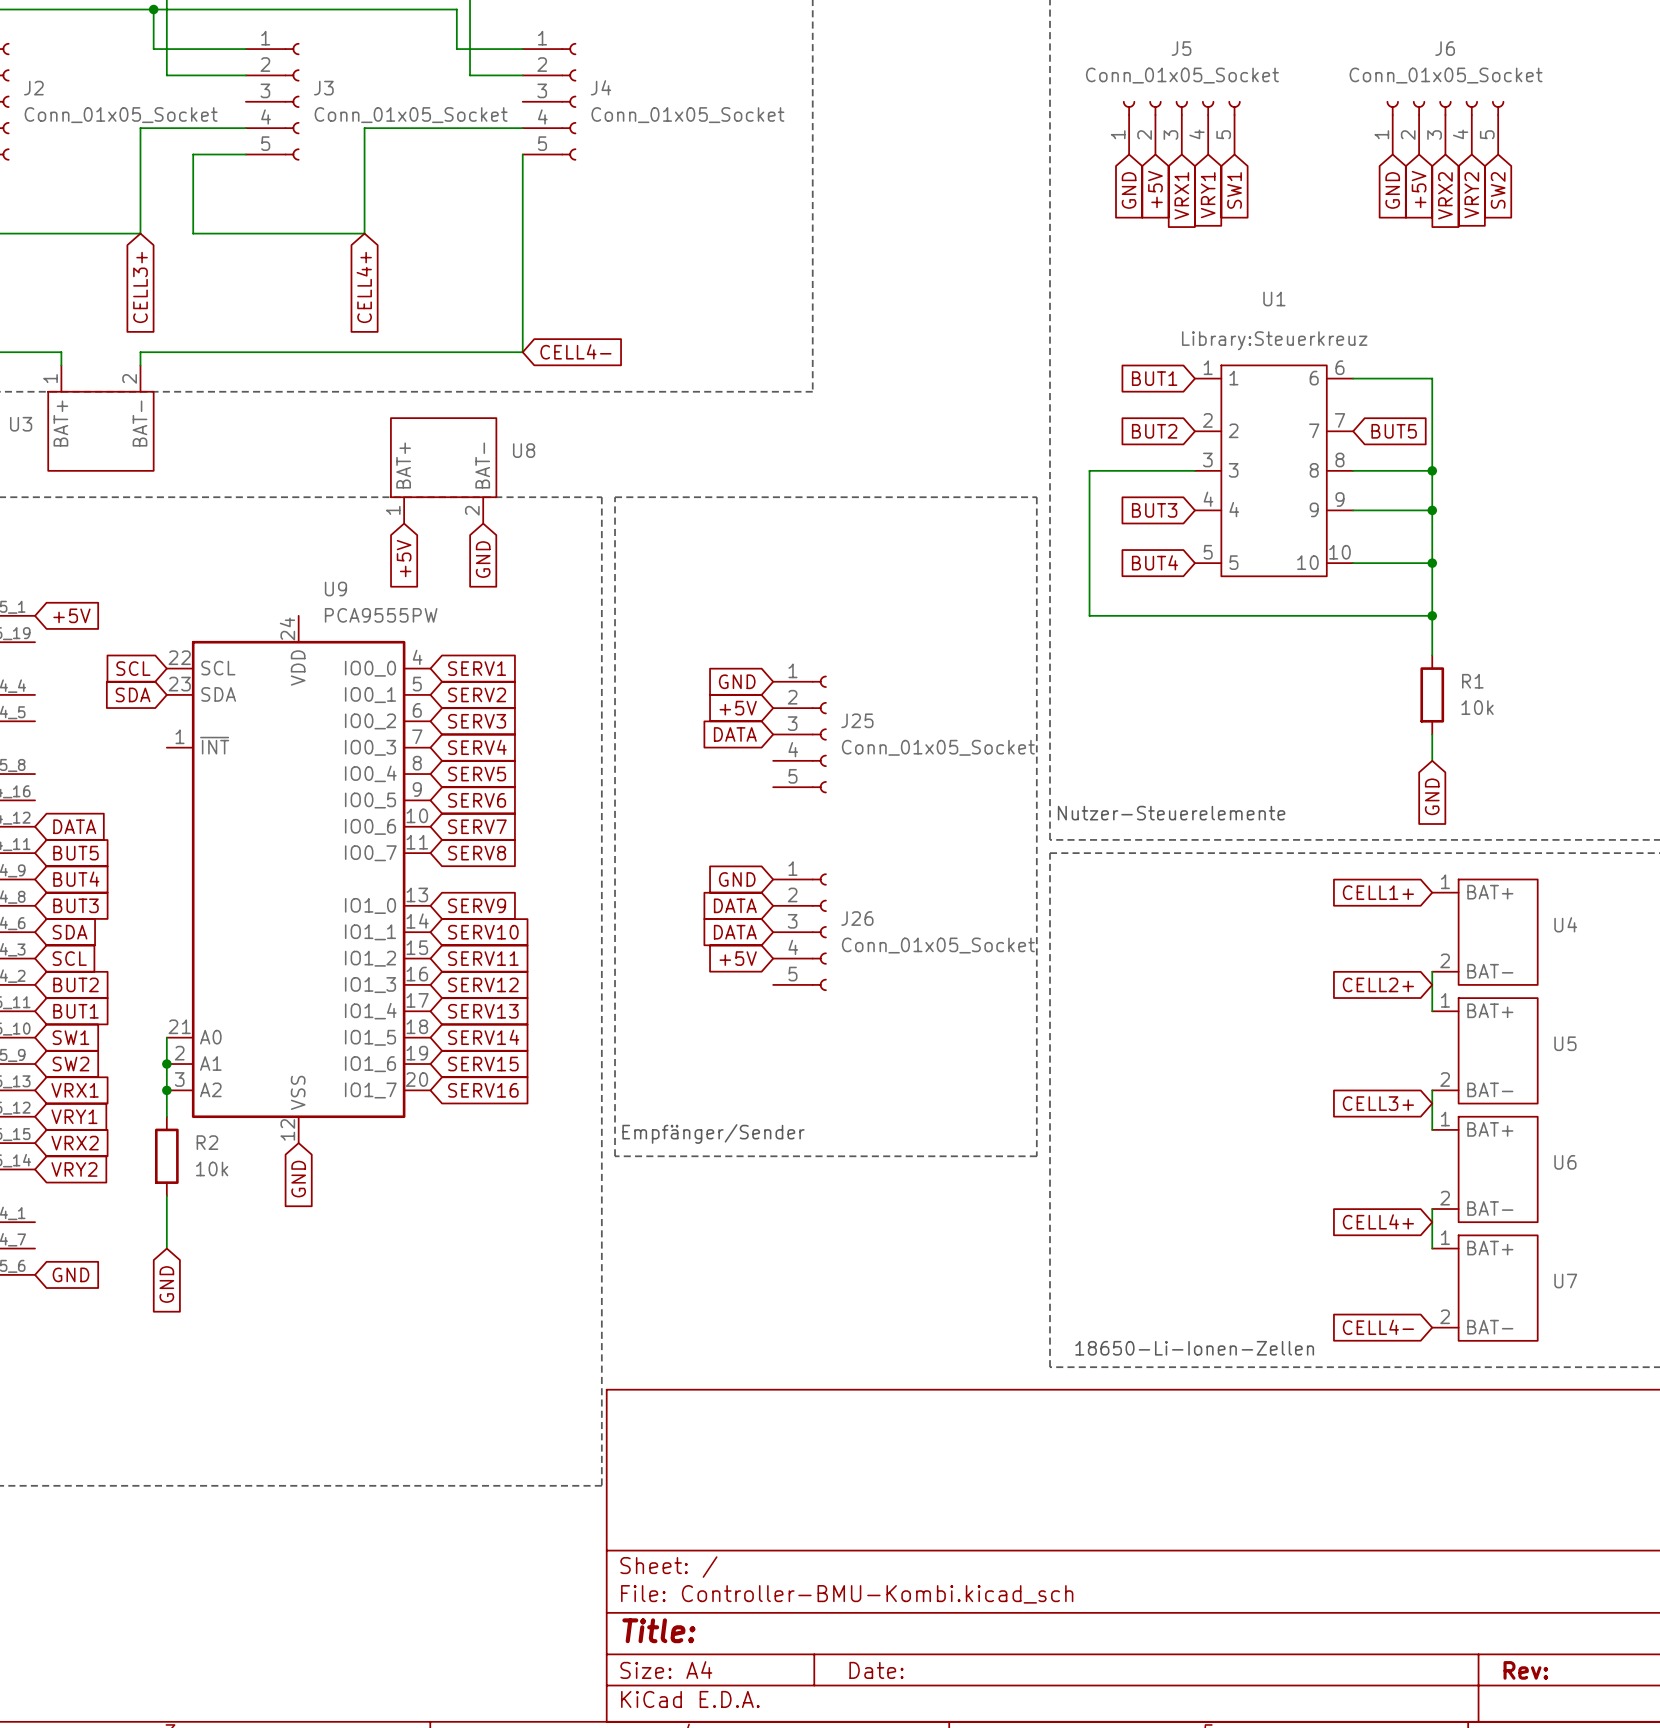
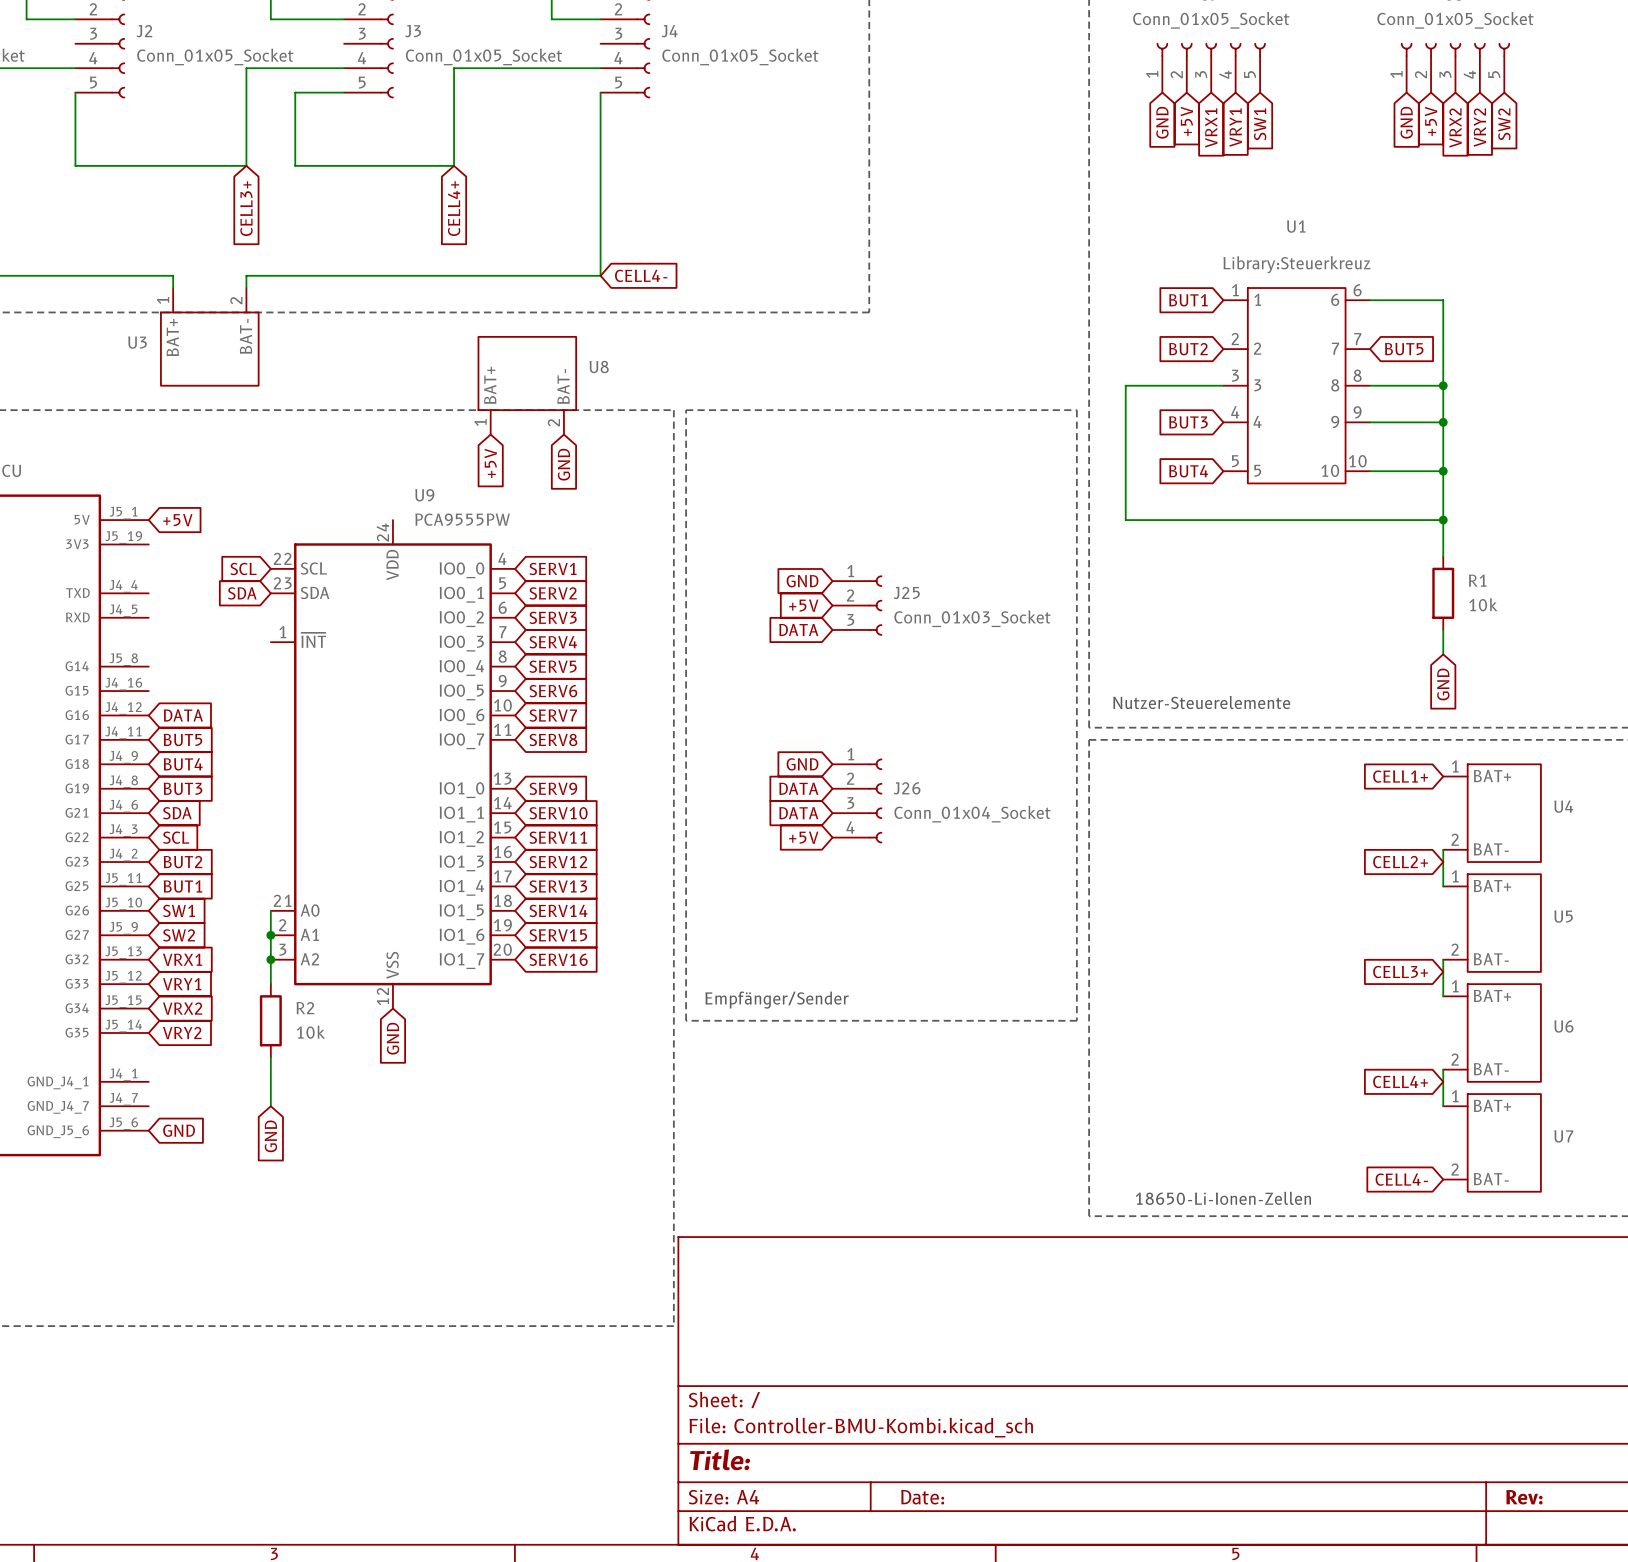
J25 symbol: [773, 675, 827, 794] -> [832, 575, 883, 636]
J25 value: Conn_01x05_Socket (938, 747) -> Conn_01x03_Socket (972, 618)
J26 symbol: [773, 873, 827, 991] -> [832, 758, 883, 844]
J26 value: Conn_01x05_Socket (938, 945) -> Conn_01x04_Socket (972, 814)

